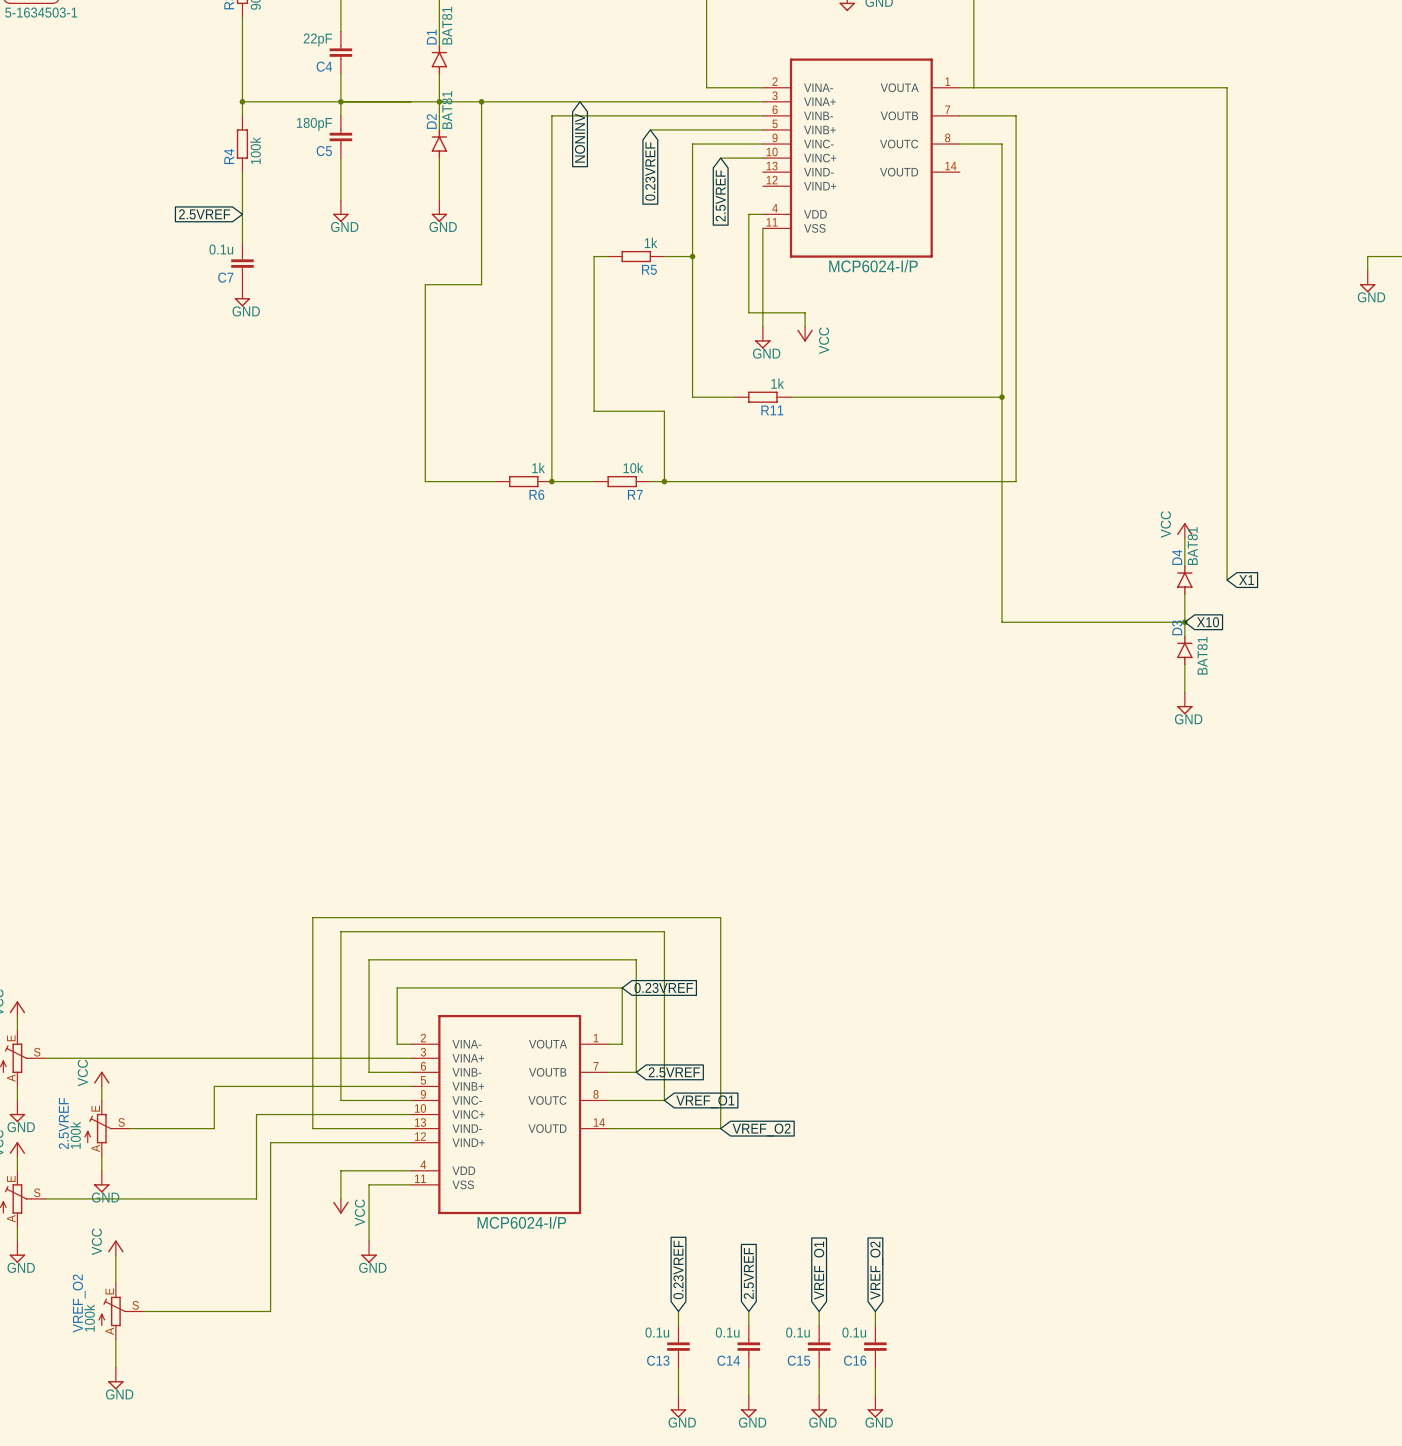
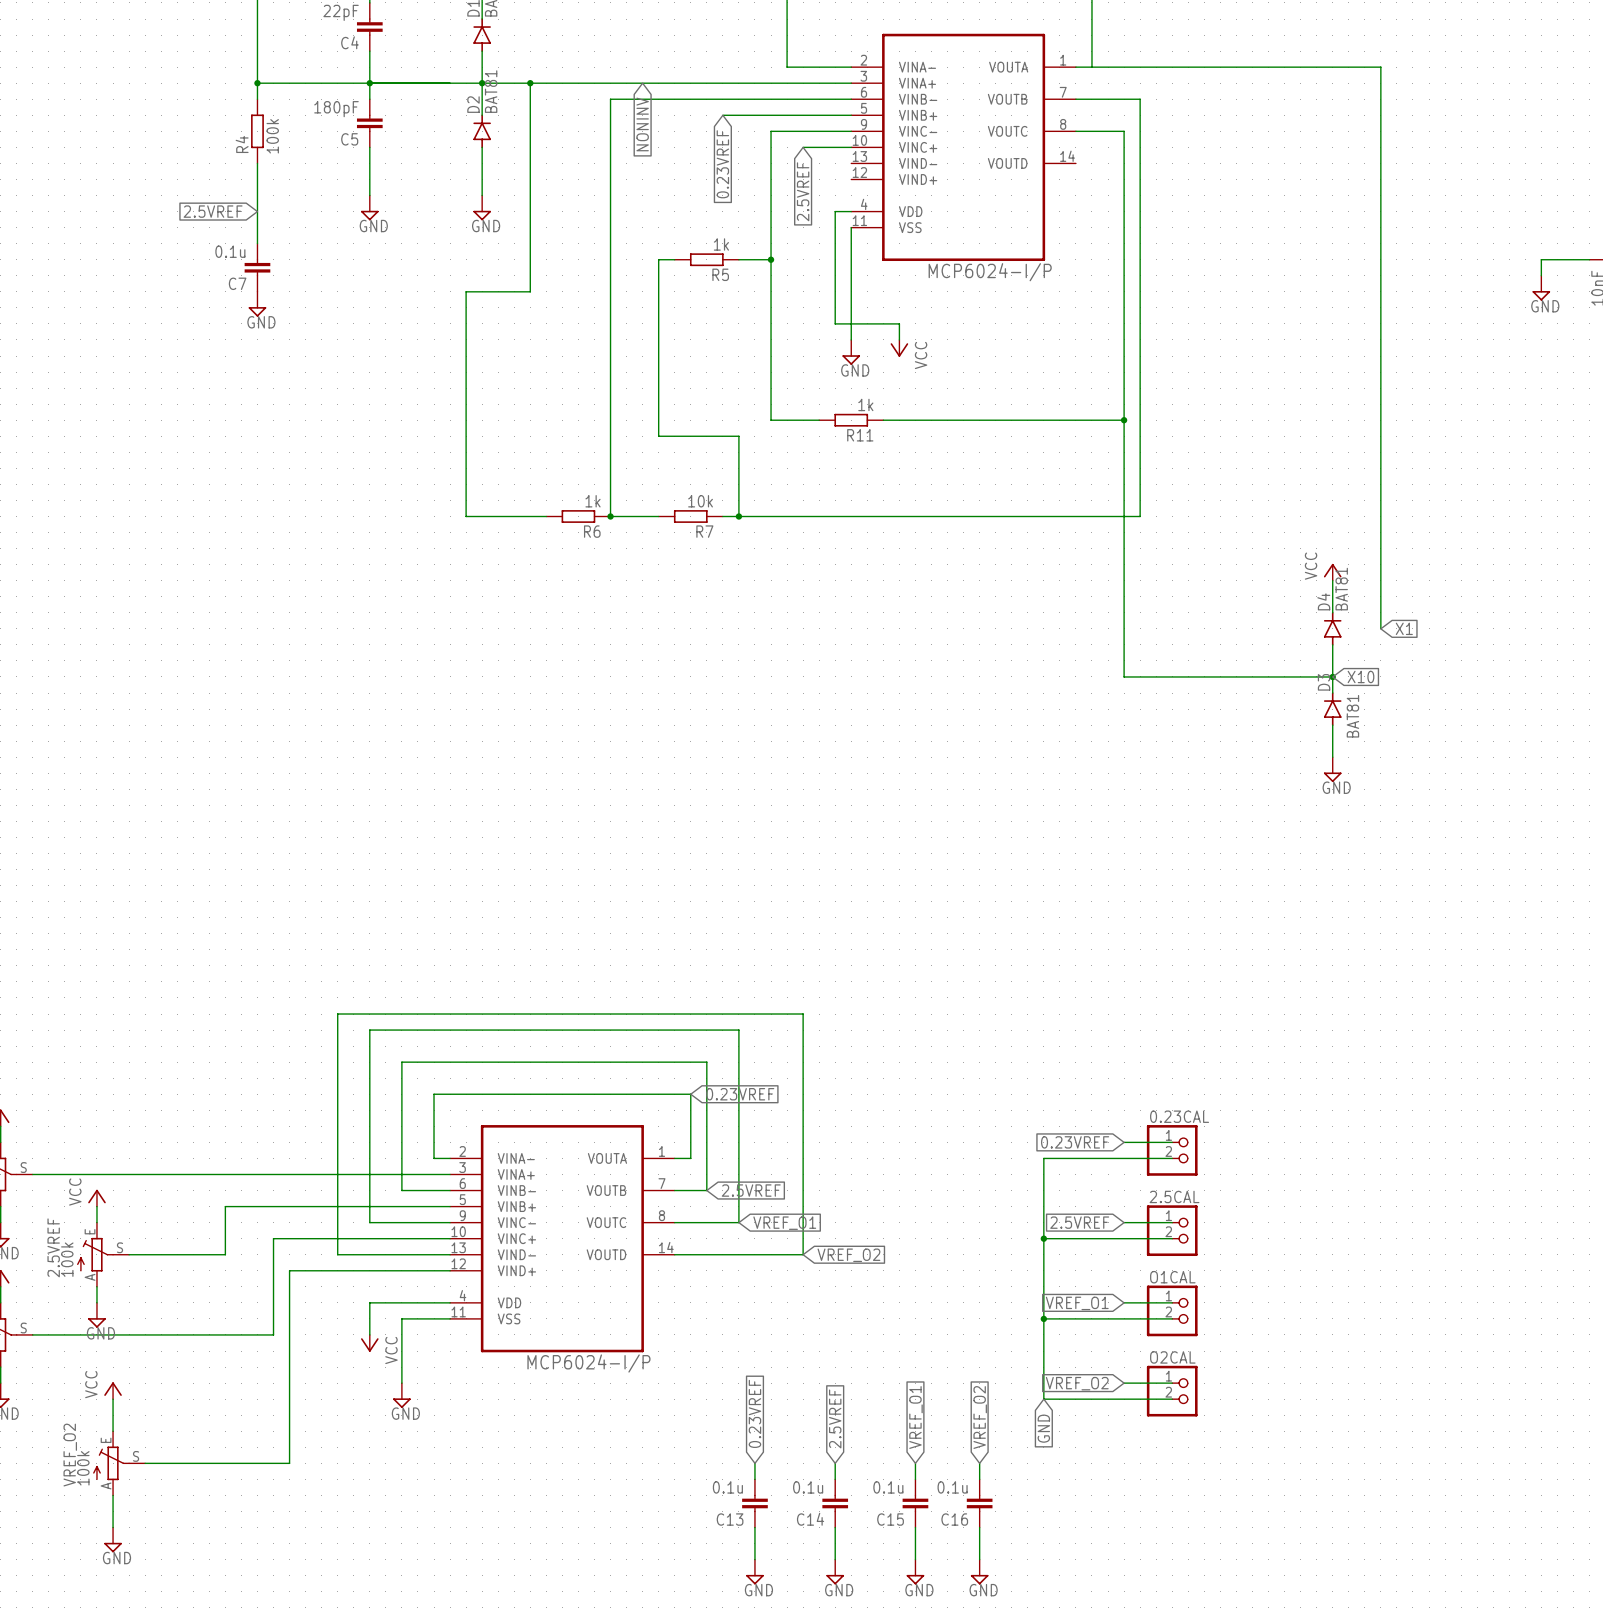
global label: none -> 0.23VREF (1075, 1142)
wire: none -> (1124, 1142) (1172, 1142)
0.23CAL: none -> (1172, 1150)
wire: none -> (1172, 1158) (1043, 1158) (1043, 1399) (1172, 1399)
global label: none -> 2.5VREF (1079, 1222)
wire: none -> (1124, 1222) (1172, 1222)
2.5CAL: none -> (1172, 1230)
wire: none -> (1043, 1238) (1172, 1238)
junction: none -> (1043, 1238)
wire: none -> (1124, 1302) (1172, 1302)
global label: none -> VREF_O1 (1077, 1303)
O1CAL: none -> (1172, 1310)
wire: none -> (1043, 1318) (1172, 1318)
junction: none -> (1043, 1318)
wire: none -> (1124, 1383) (1172, 1383)
global label: none -> VREF_O2 (1077, 1383)
O2CAL: none -> (1172, 1391)
global label: none -> GND (1043, 1428)

